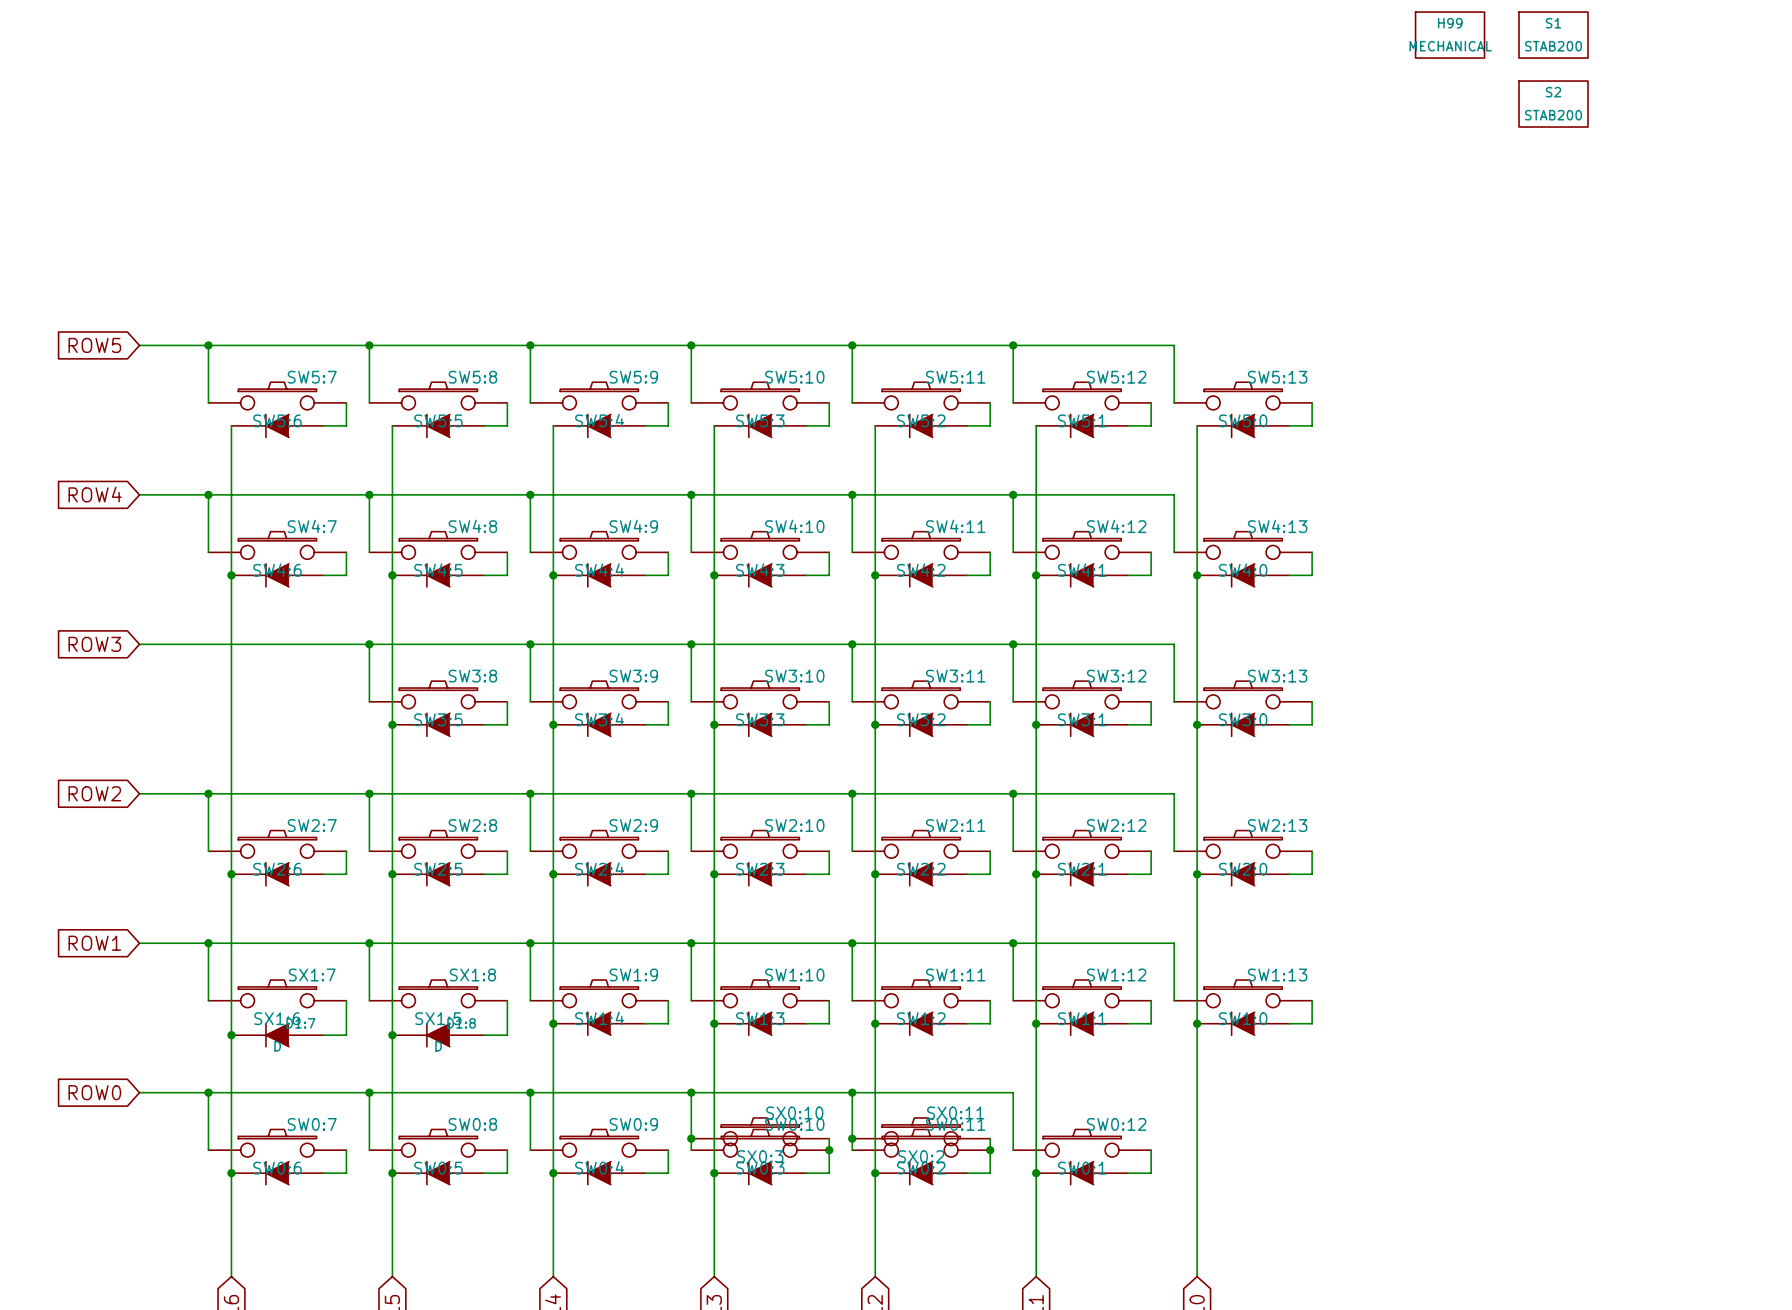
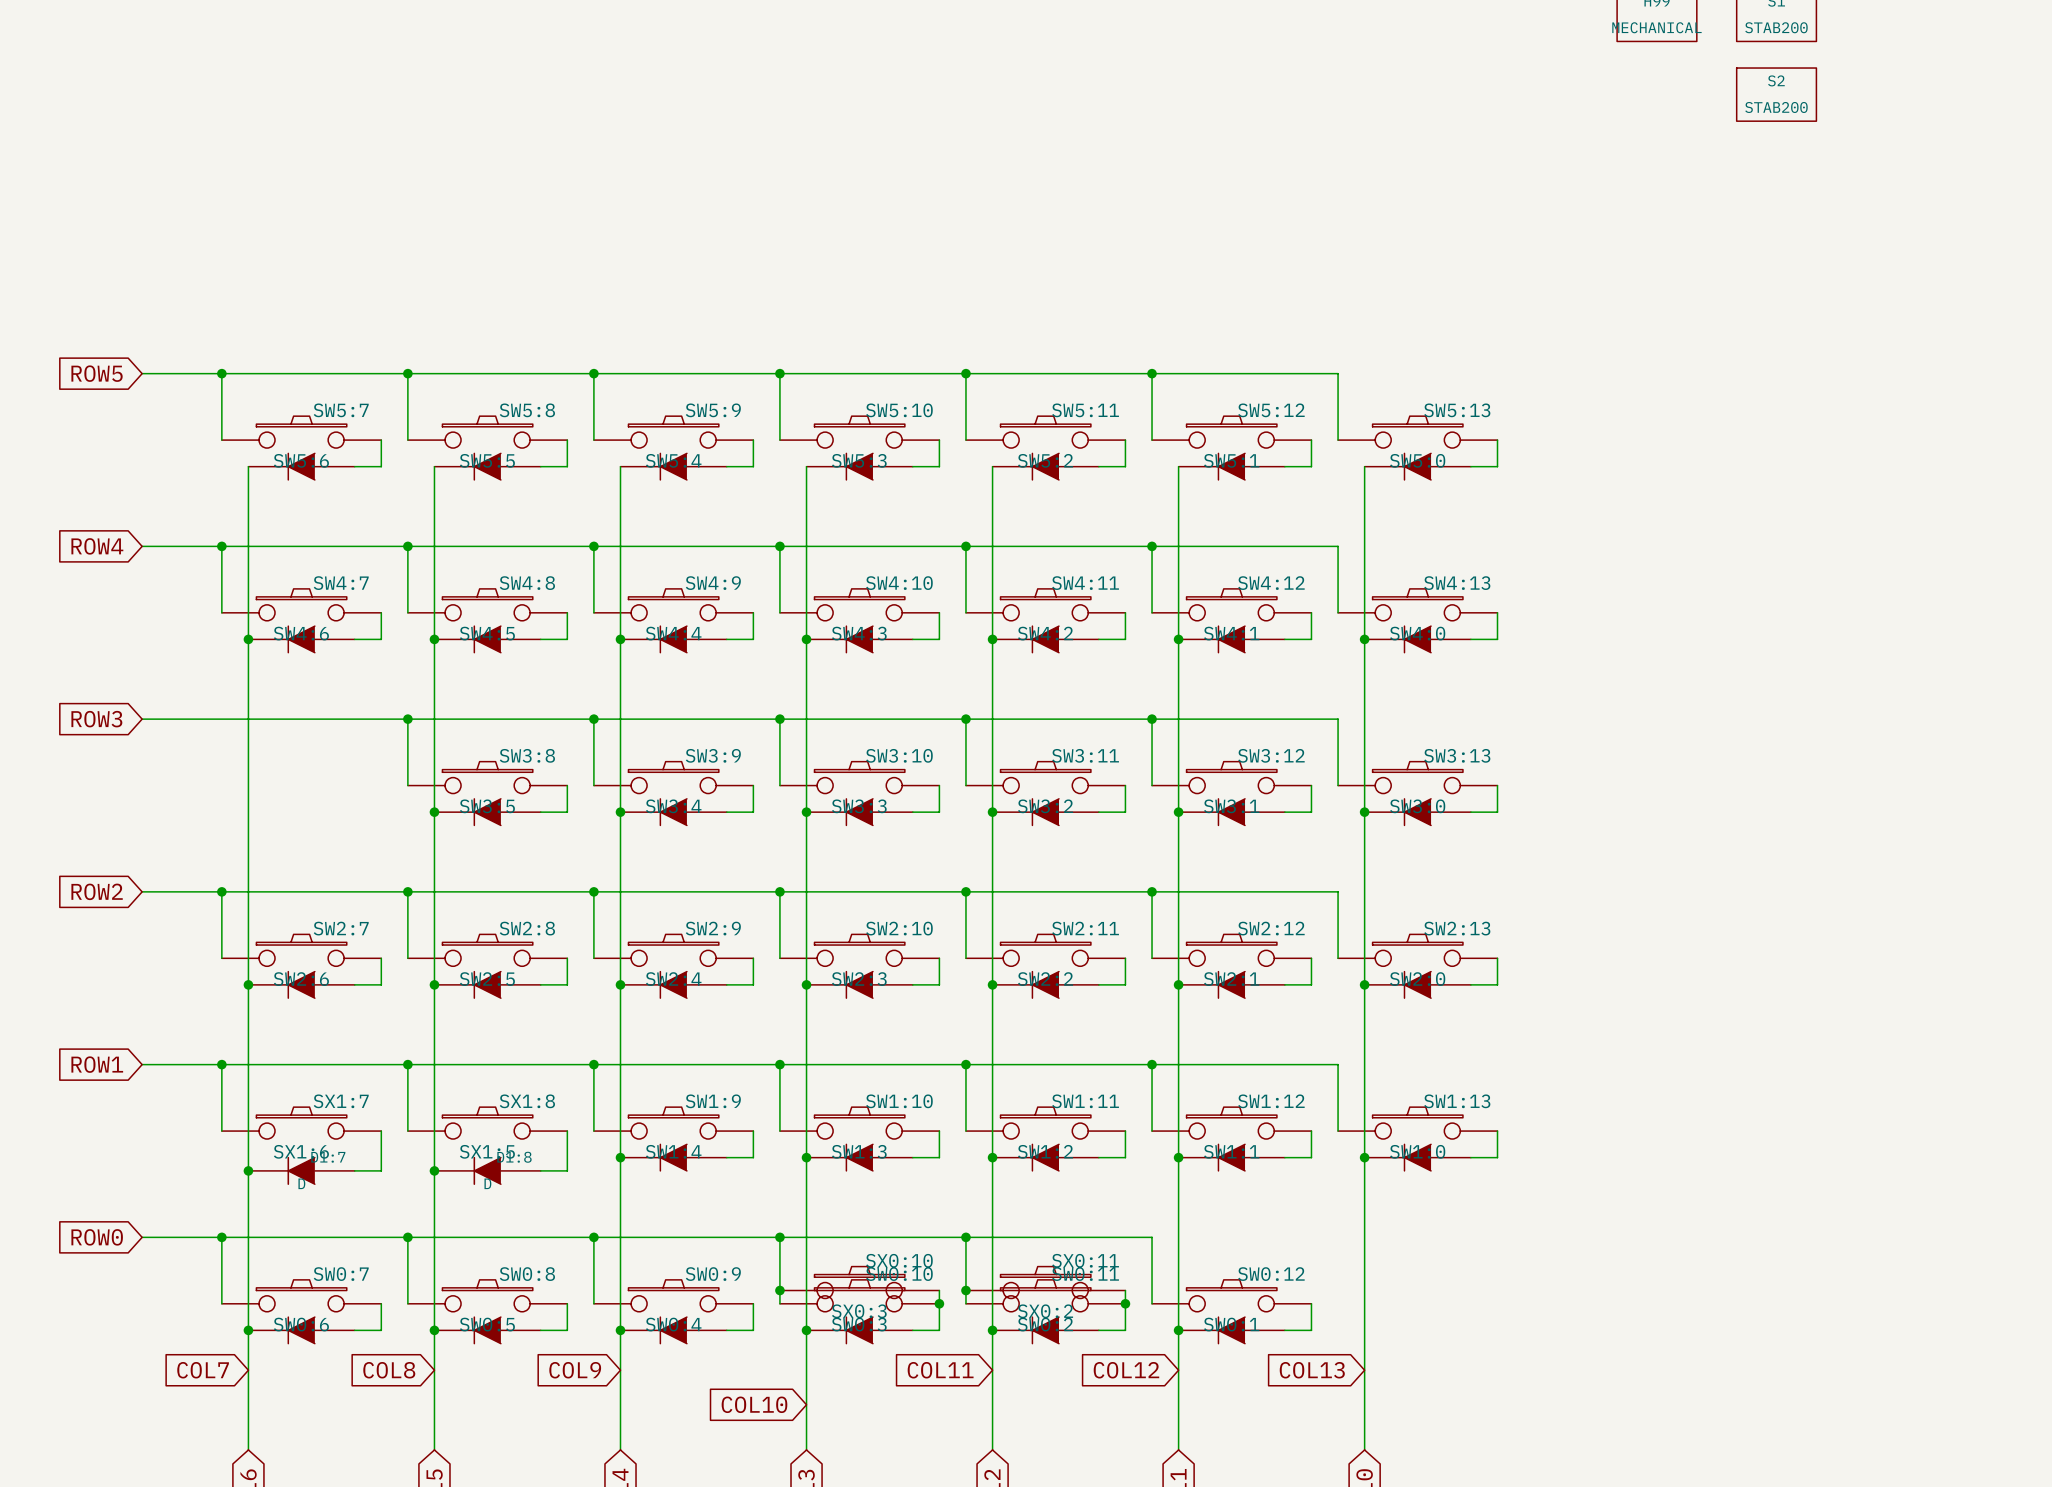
global label: none -> COL7 (203, 1370)
global label: none -> COL8 (389, 1370)
global label: none -> COL9 (575, 1370)
global label: none -> COL11 (940, 1370)
global label: none -> COL12 (1126, 1370)
global label: none -> COL13 (1312, 1370)
global label: none -> COL10 (754, 1404)

